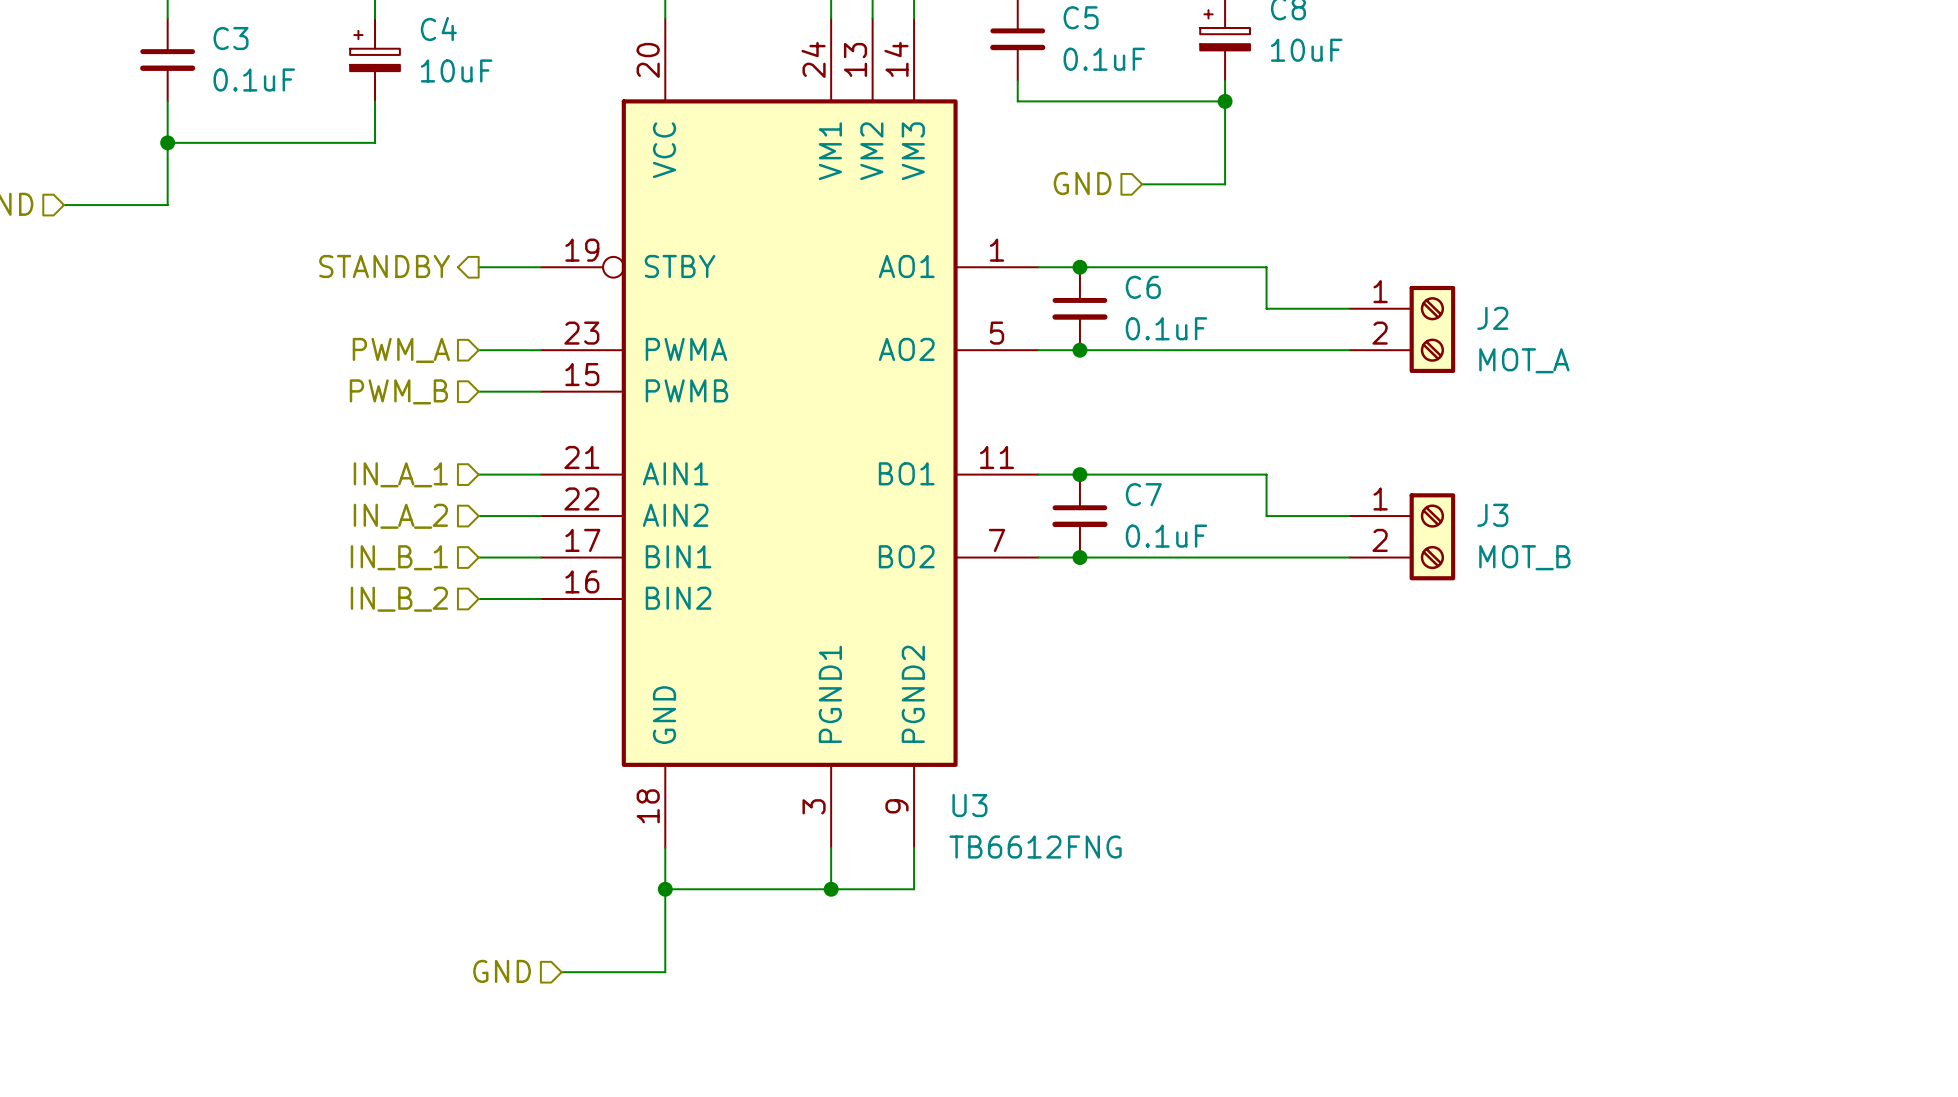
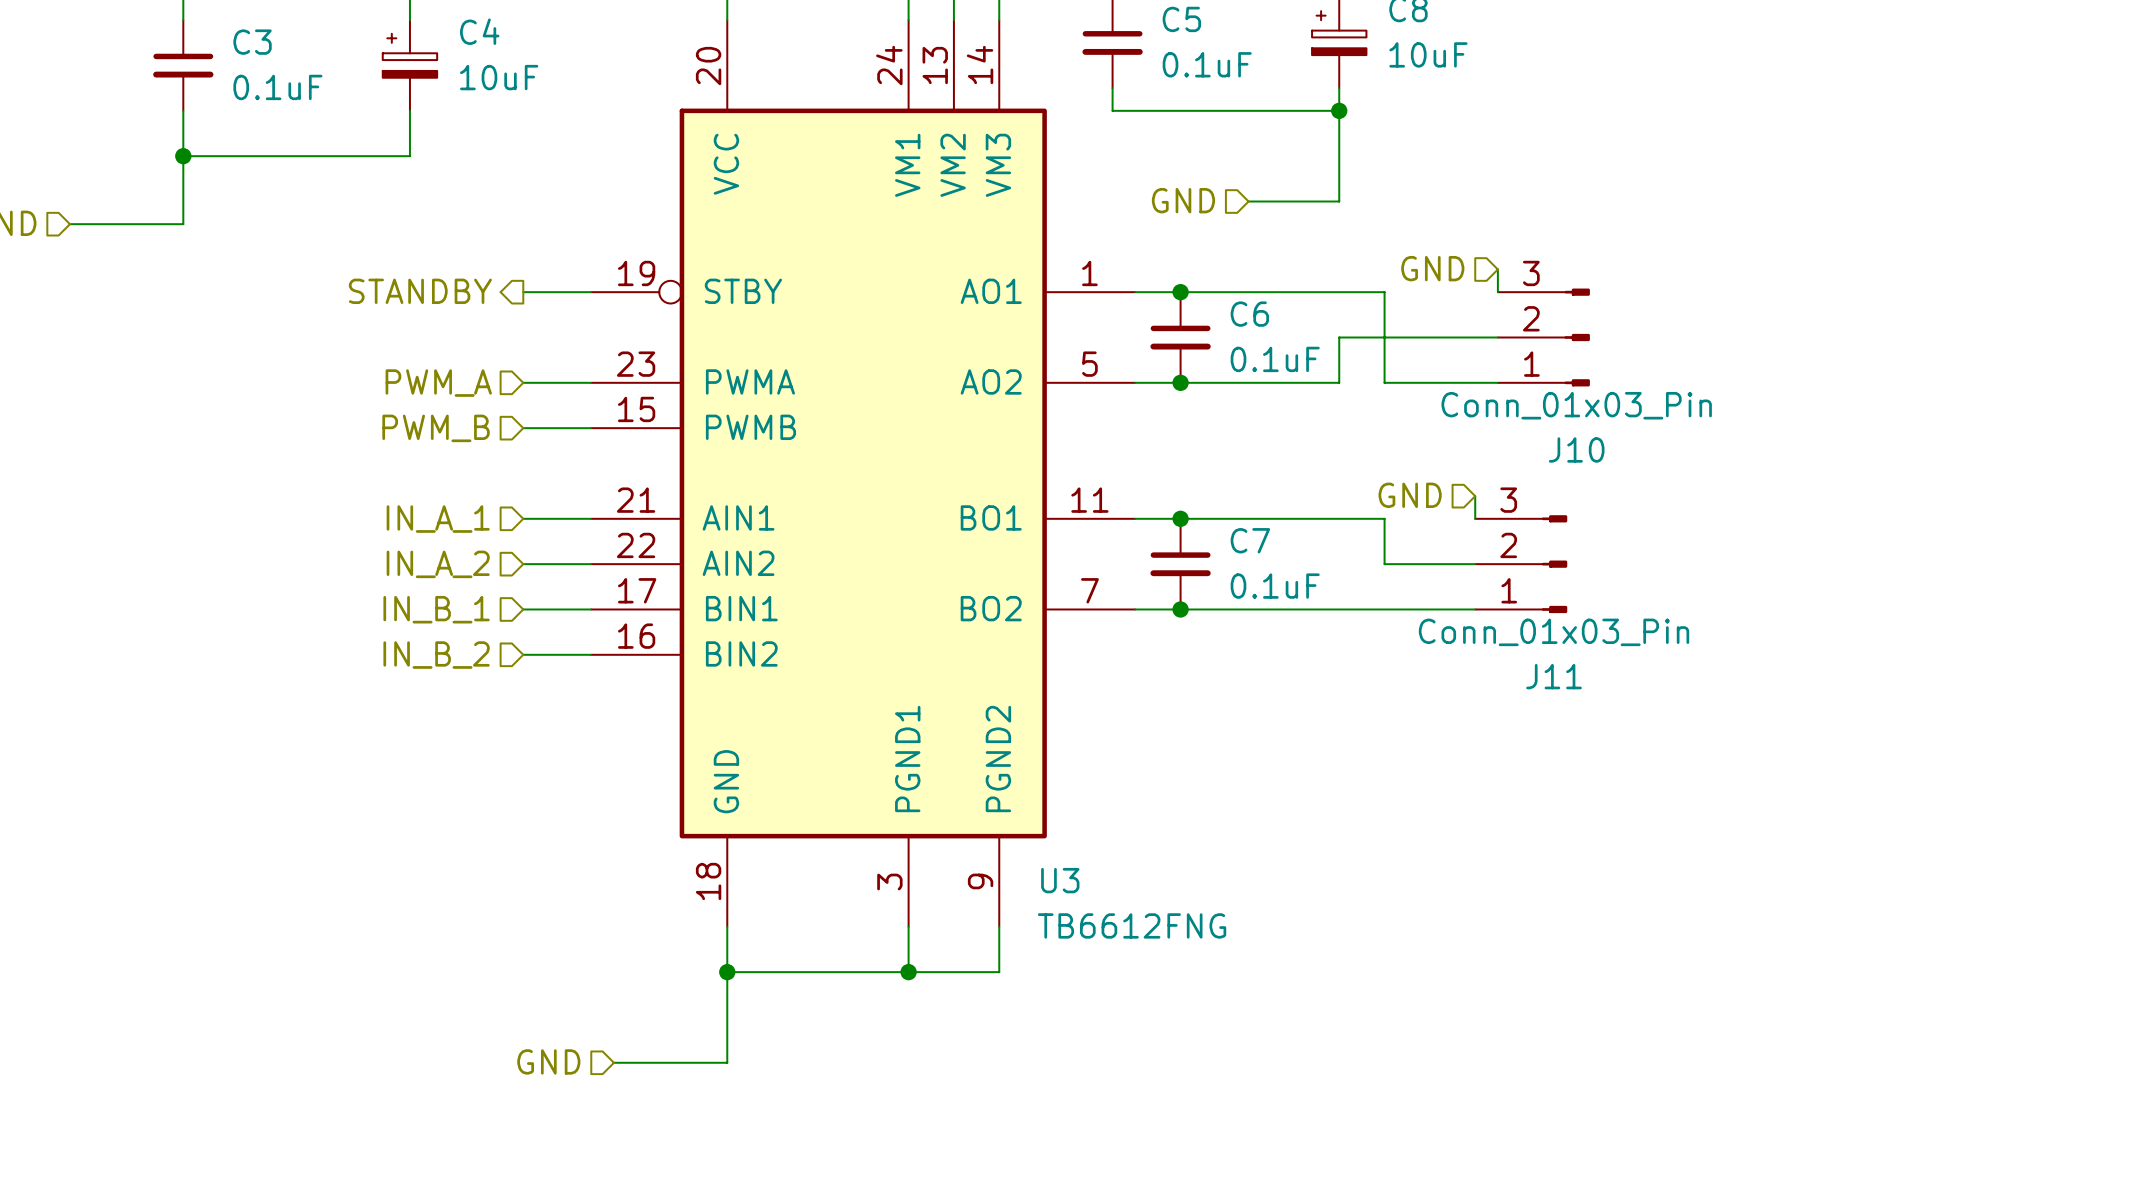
hierarchical label: none -> GND (1432, 268)
wire: none -> (1497, 269) (1497, 292)
J10: none -> Conn_01x03_Pin (1543, 337)
J2: MOT_A (1402, 329) -> none
wire: (1225, 350) (1266, 350) -> (1339, 382) (1339, 337) (1384, 337) (1384, 382)
hierarchical label: none -> GND (1410, 495)
wire: none -> (1475, 496) (1475, 518)
J11: none -> Conn_01x03_Pin (1521, 564)
J3: MOT_B (1402, 536) -> none

